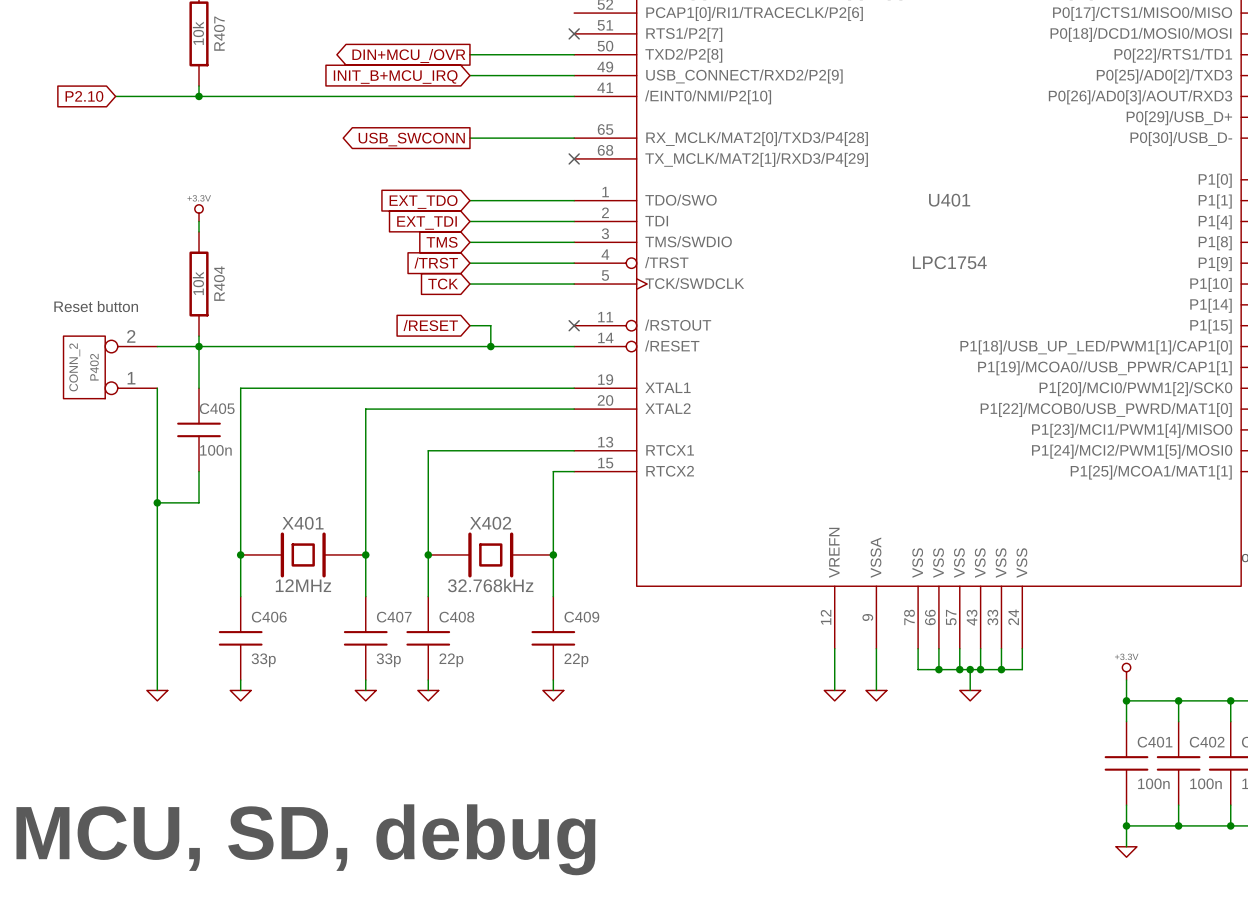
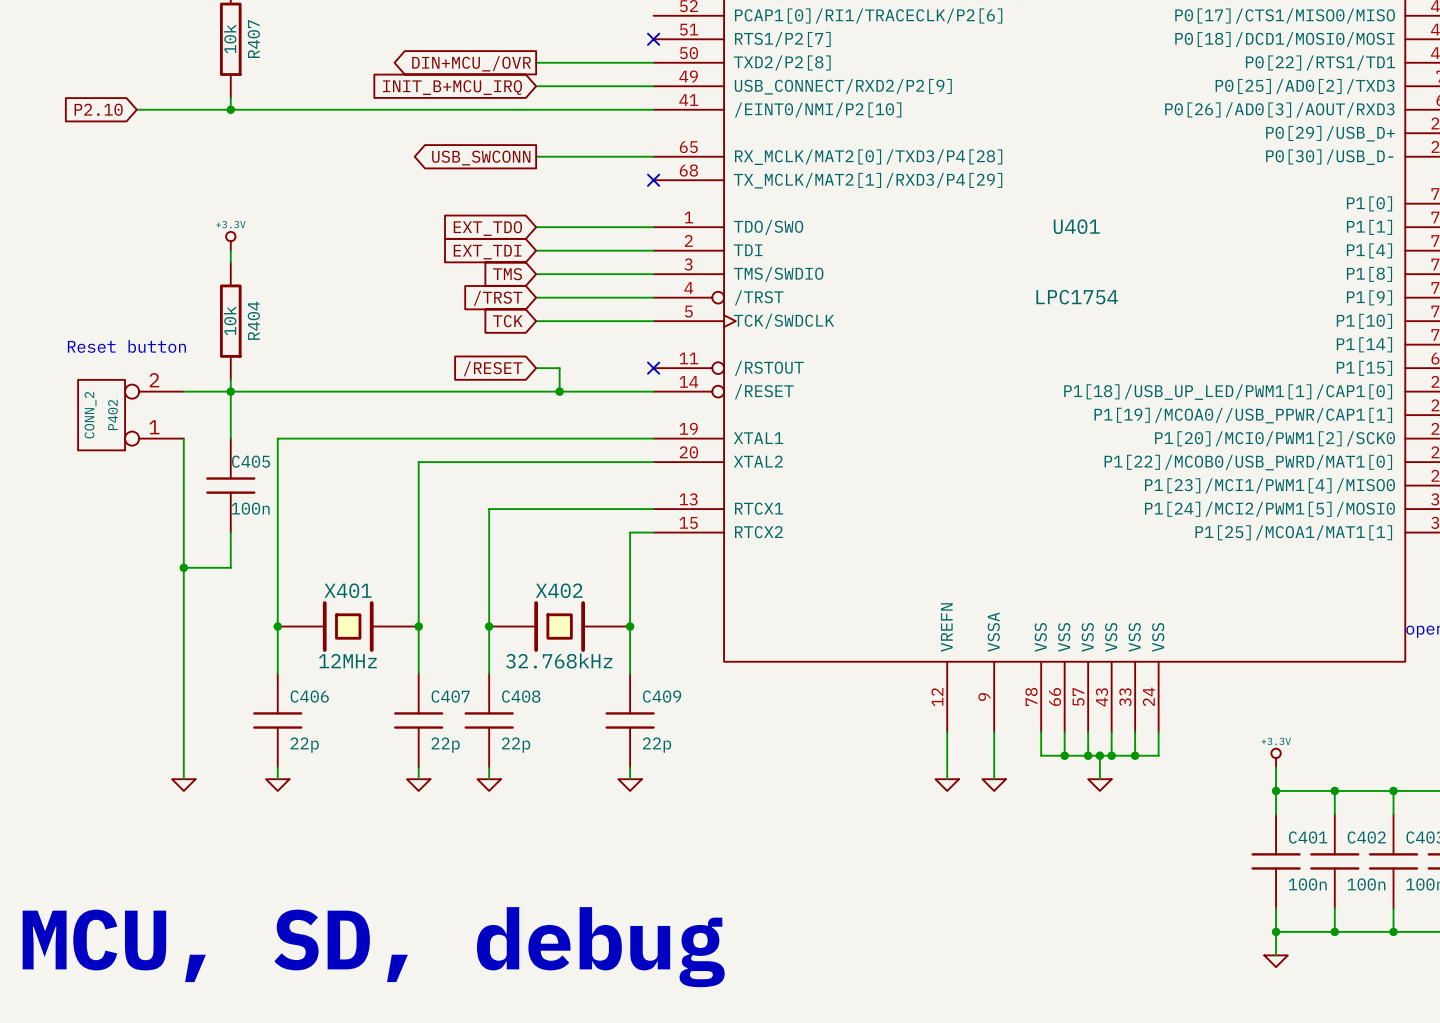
C406 value: 33p (263, 660) -> 22p (304, 745)
C407 value: 33p (388, 660) -> 22p (445, 745)

